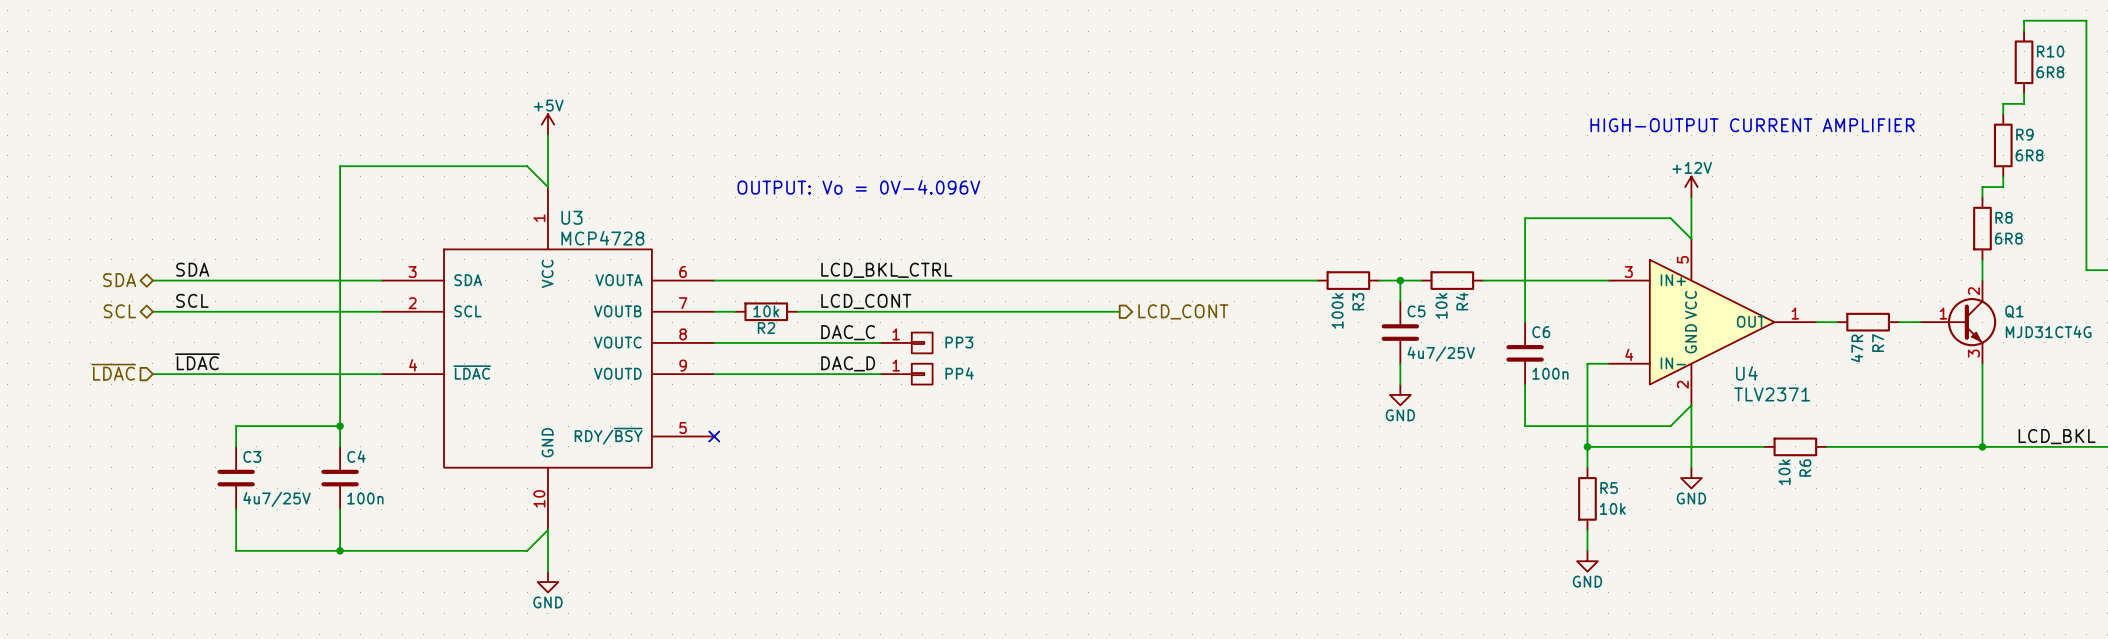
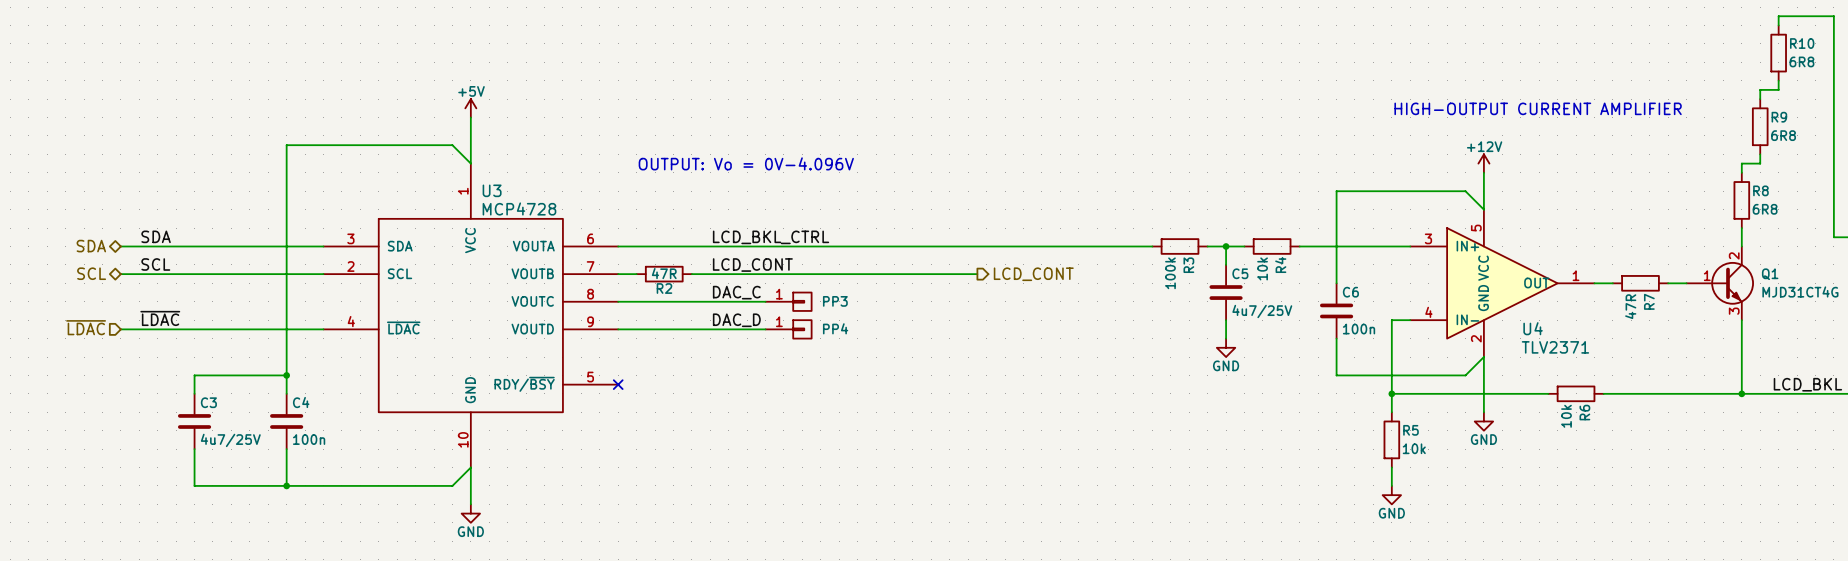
R2 value: 10k (766, 311) -> 47R (664, 273)

